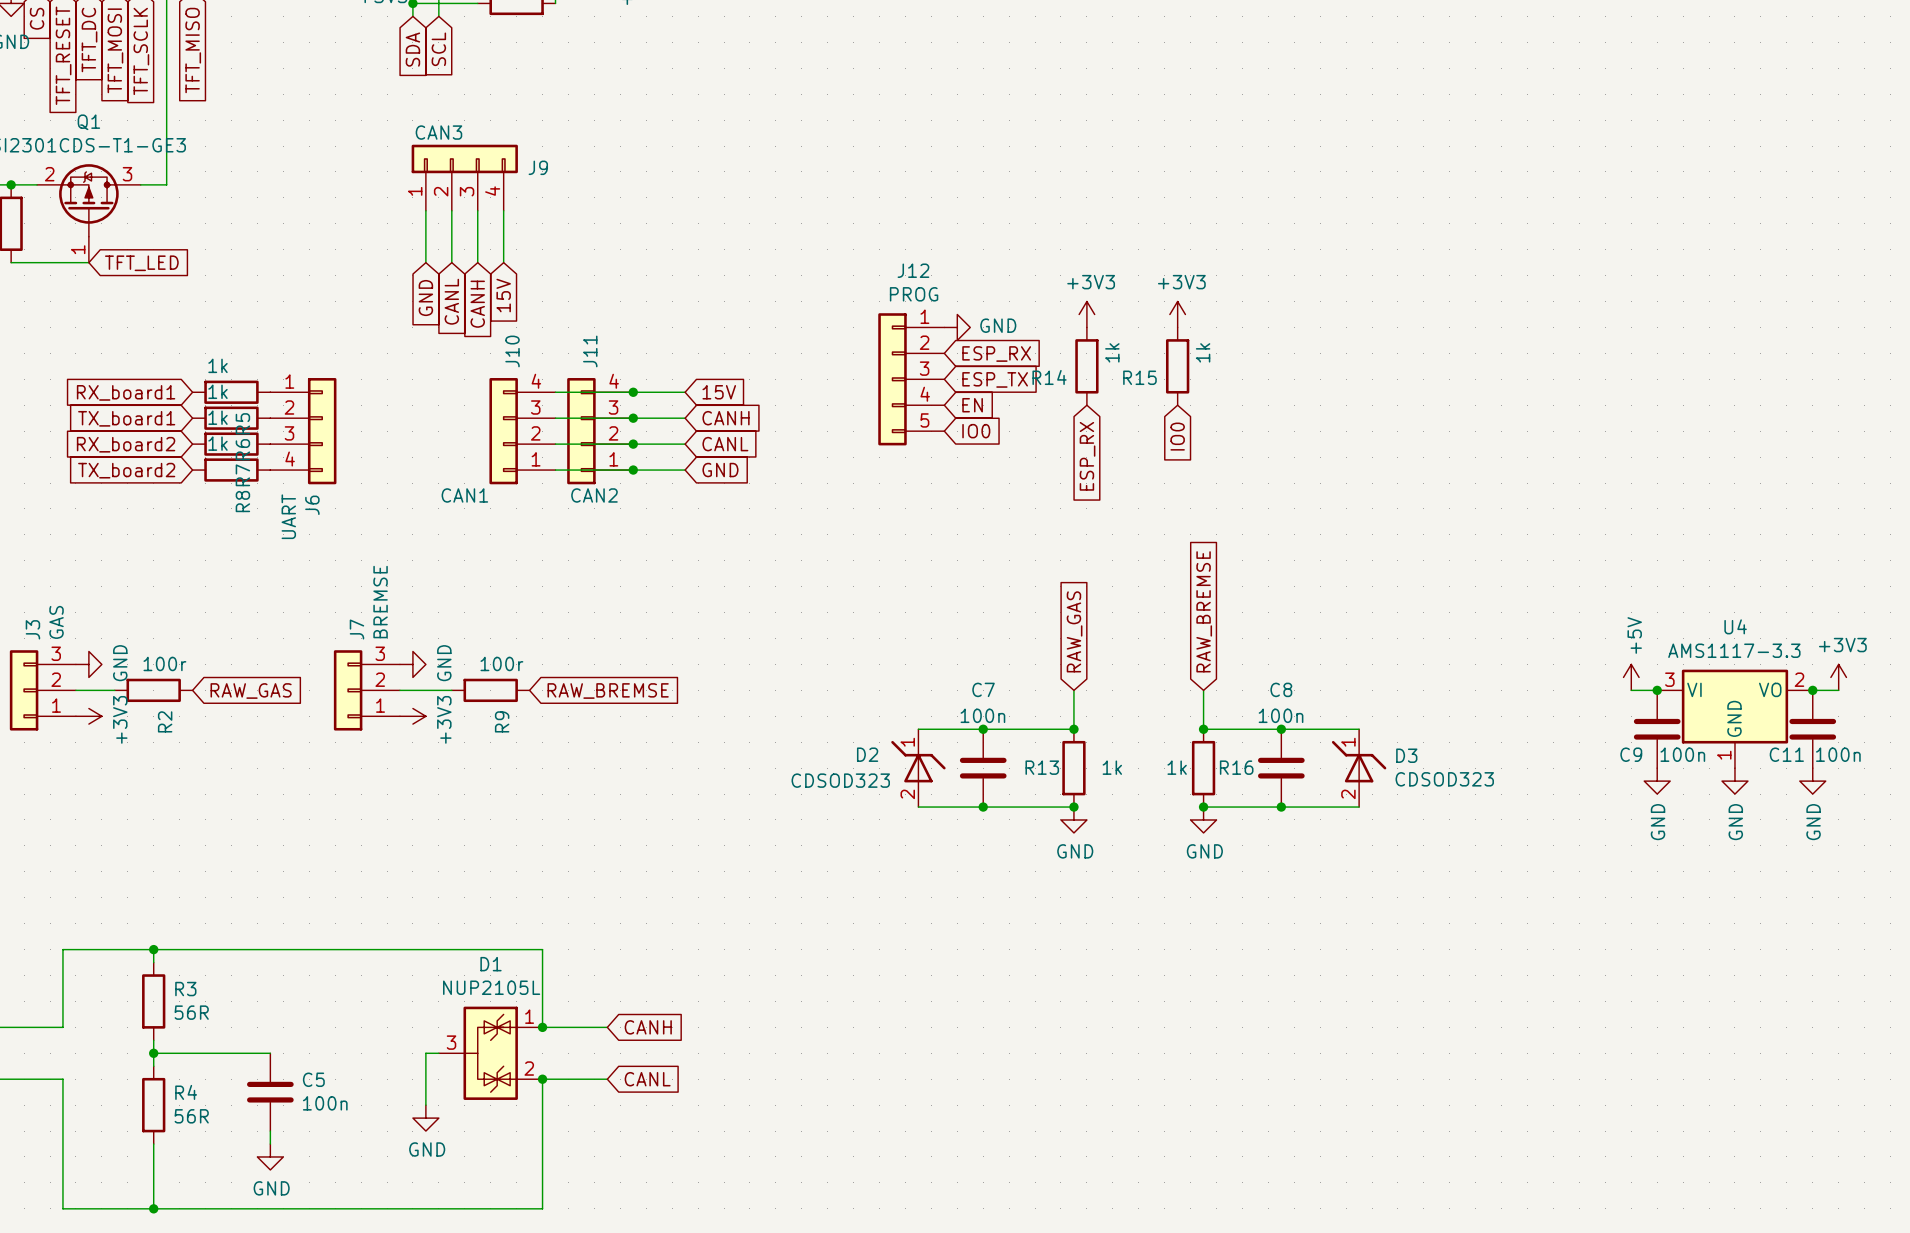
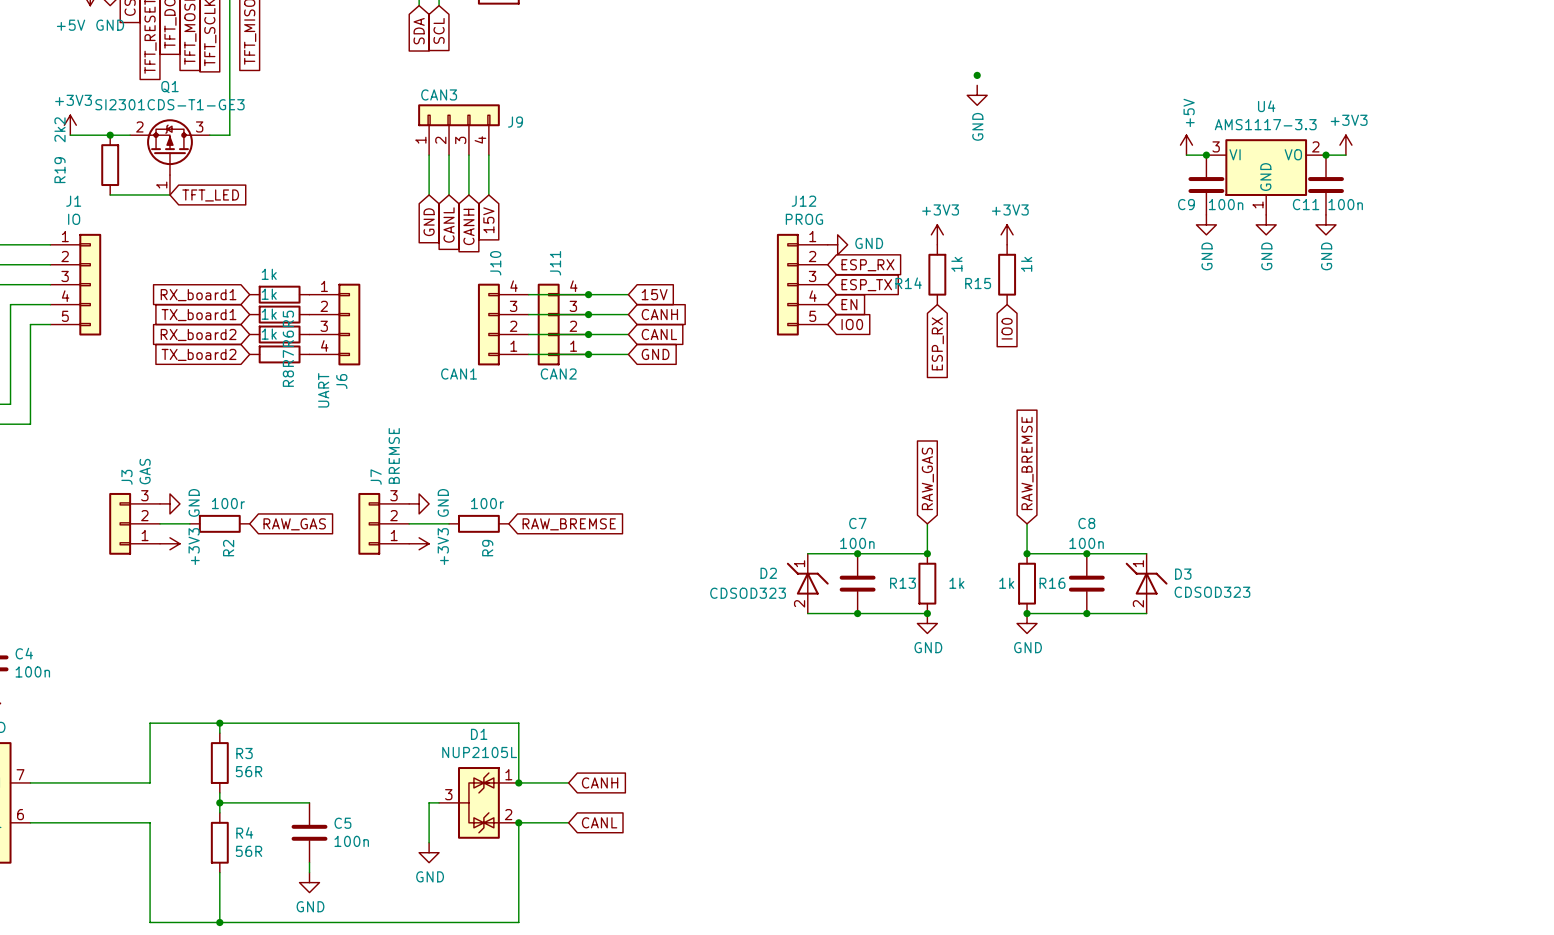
junction: none -> (977, 75)
power symbol: none -> GND (977, 95)
power symbol: none -> +5V (1186, 145)
power symbol: none -> +3V3 (1345, 145)
wire: none -> (1186, 155) (1206, 155)
junction: none -> (1206, 155)
wire: none -> (1326, 155) (1345, 155)
junction: none -> (1326, 155)
power symbol: none -> GND (1206, 224)
power symbol: none -> GND (1266, 224)
power symbol: none -> GND (1326, 224)
power symbol: +5V (1631, 677) -> none
power symbol: +3V3 (1838, 677) -> none
wire: (1631, 690) (1657, 690) -> none
junction: (1657, 690) -> none
wire: (1812, 690) (1838, 690) -> none
junction: (1812, 690) -> none
U4 position: (1734, 718) -> (1266, 177)
C9 position: (1657, 729) -> (1206, 185)
C11 position: (1812, 729) -> (1326, 185)
power symbol: GND (1657, 781) -> none
power symbol: GND (1734, 781) -> none
power symbol: GND (1812, 781) -> none

